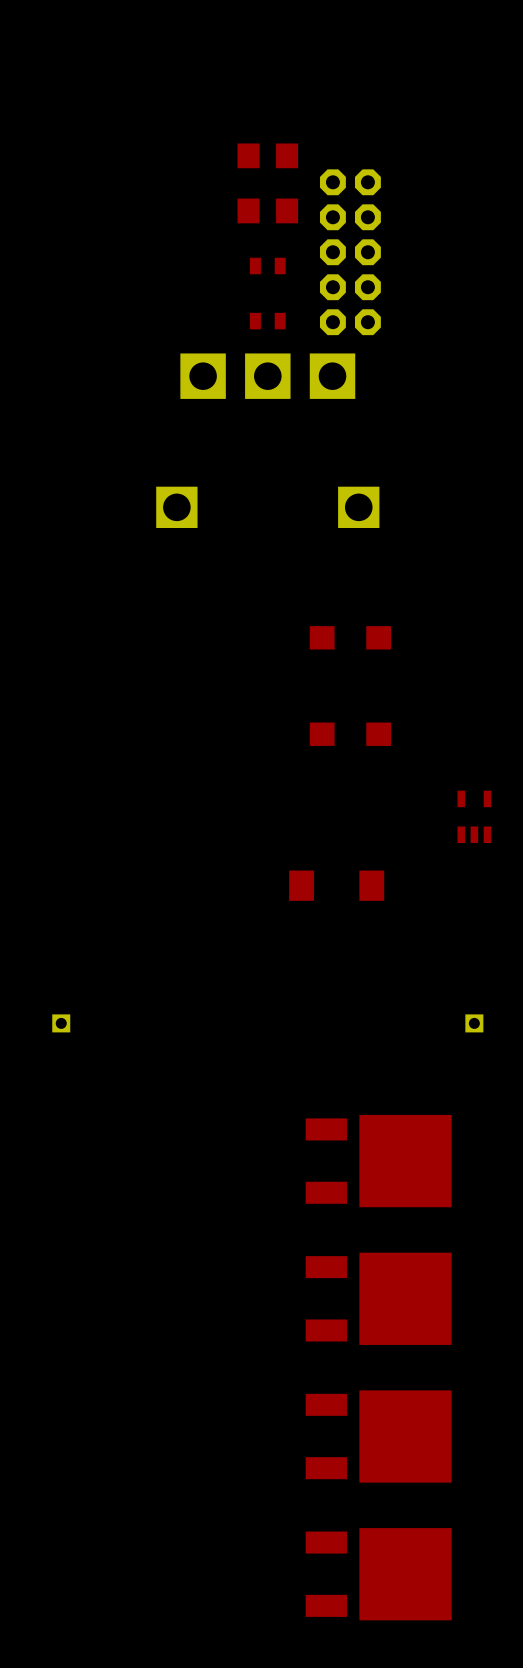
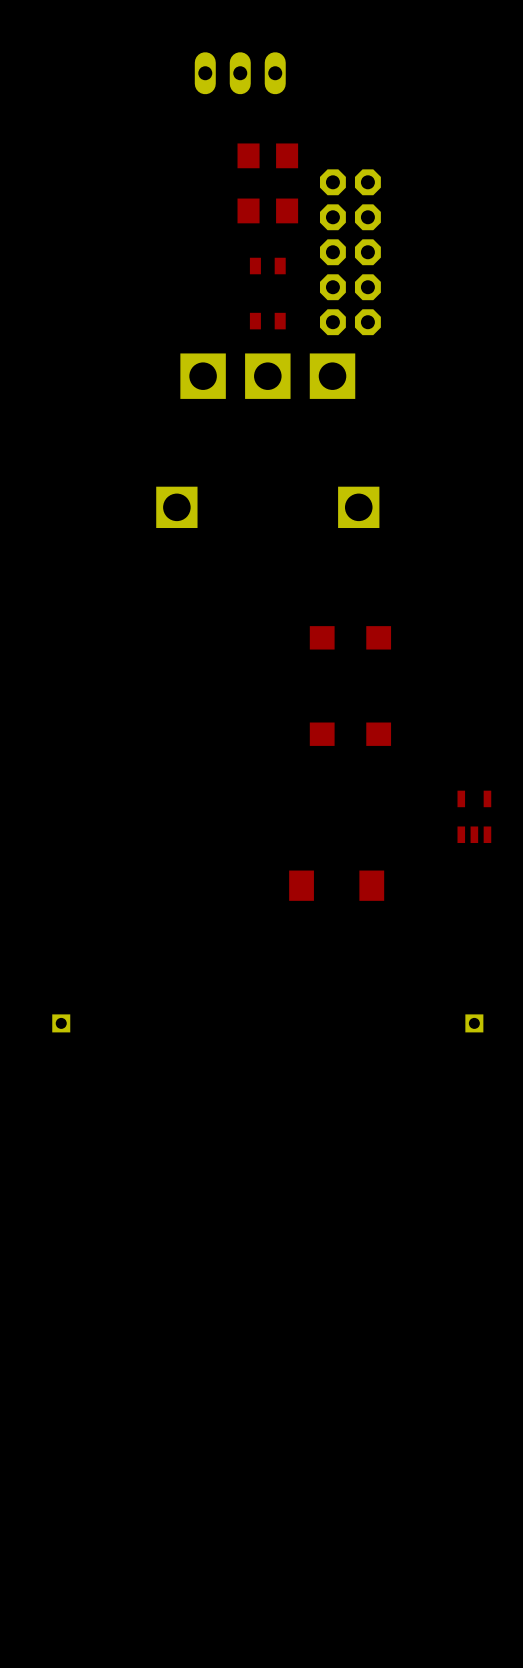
part: none -> (240, 73)
part: (378, 1161) -> none
part: (378, 1298) -> none
part: (378, 1436) -> none
part: (378, 1574) -> none

